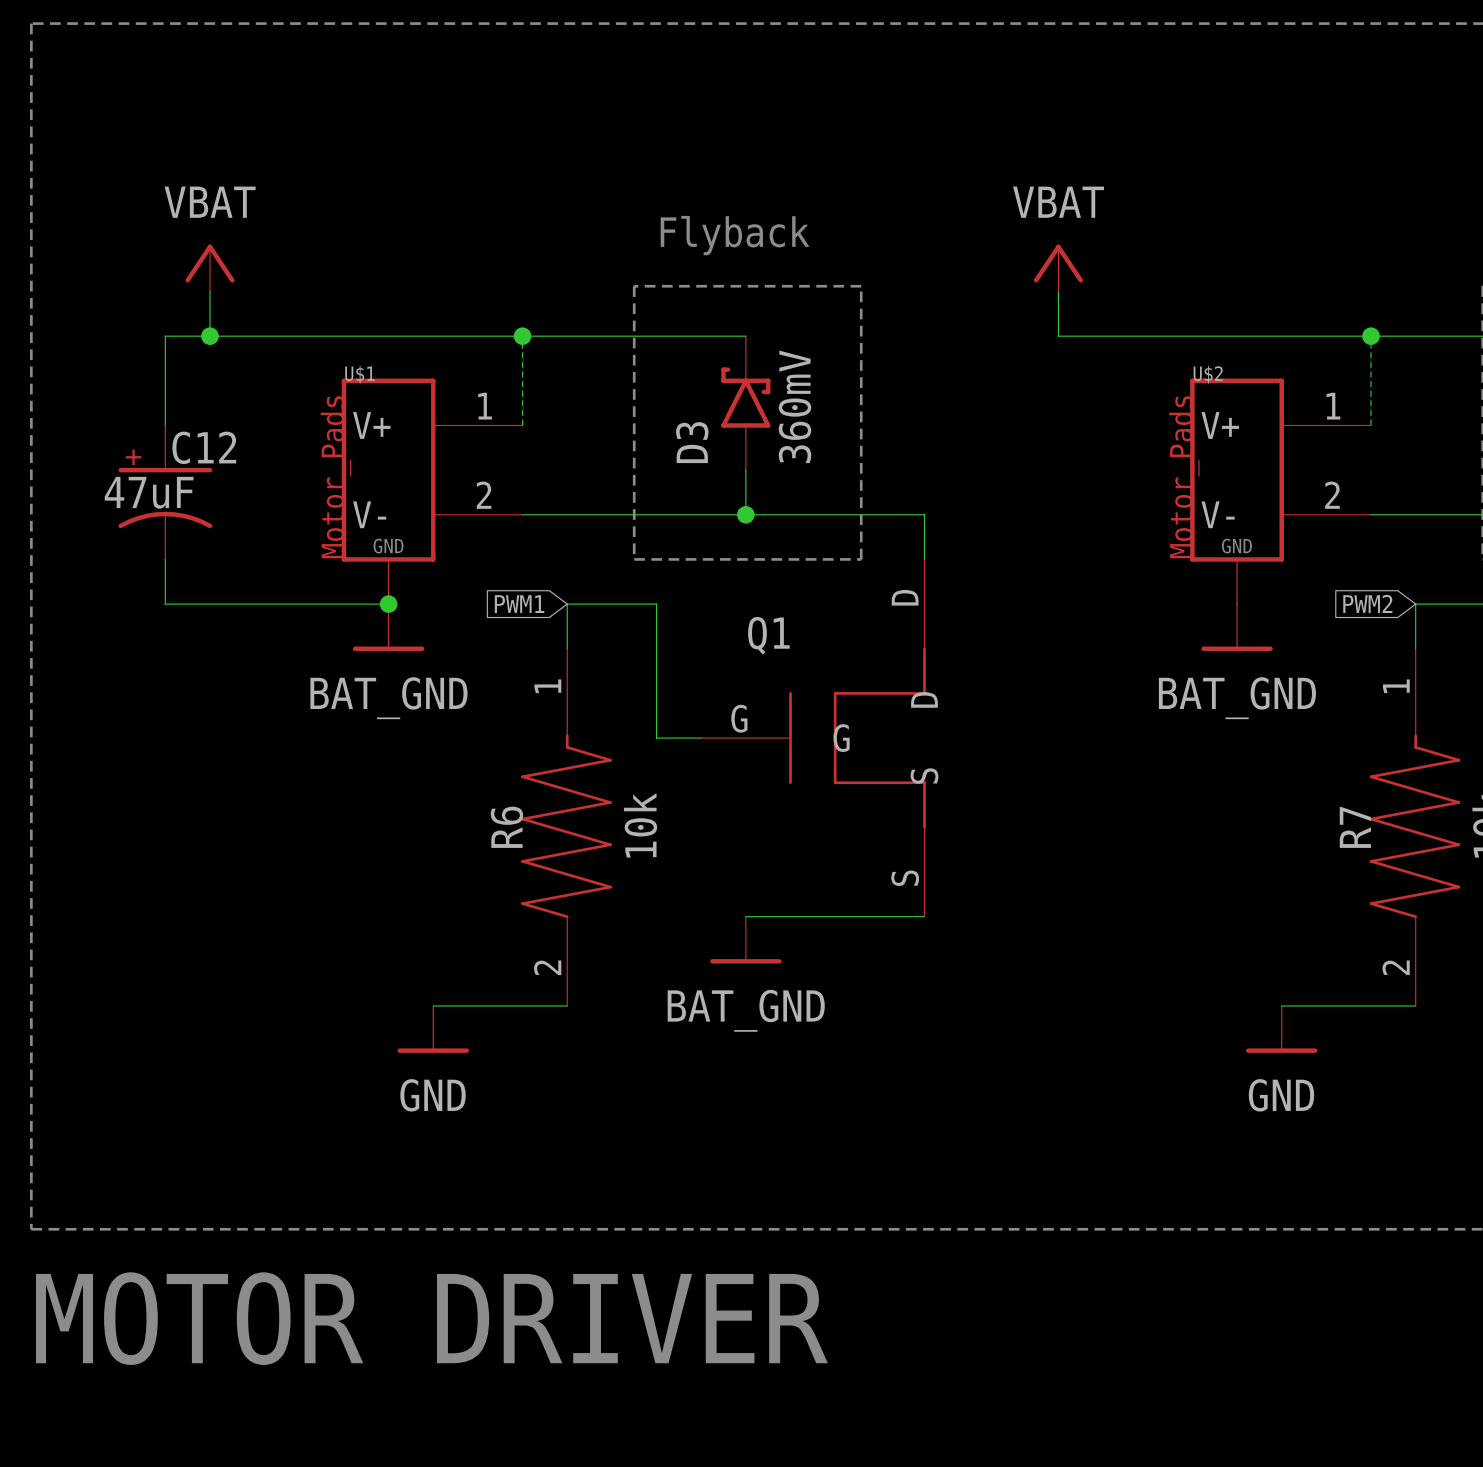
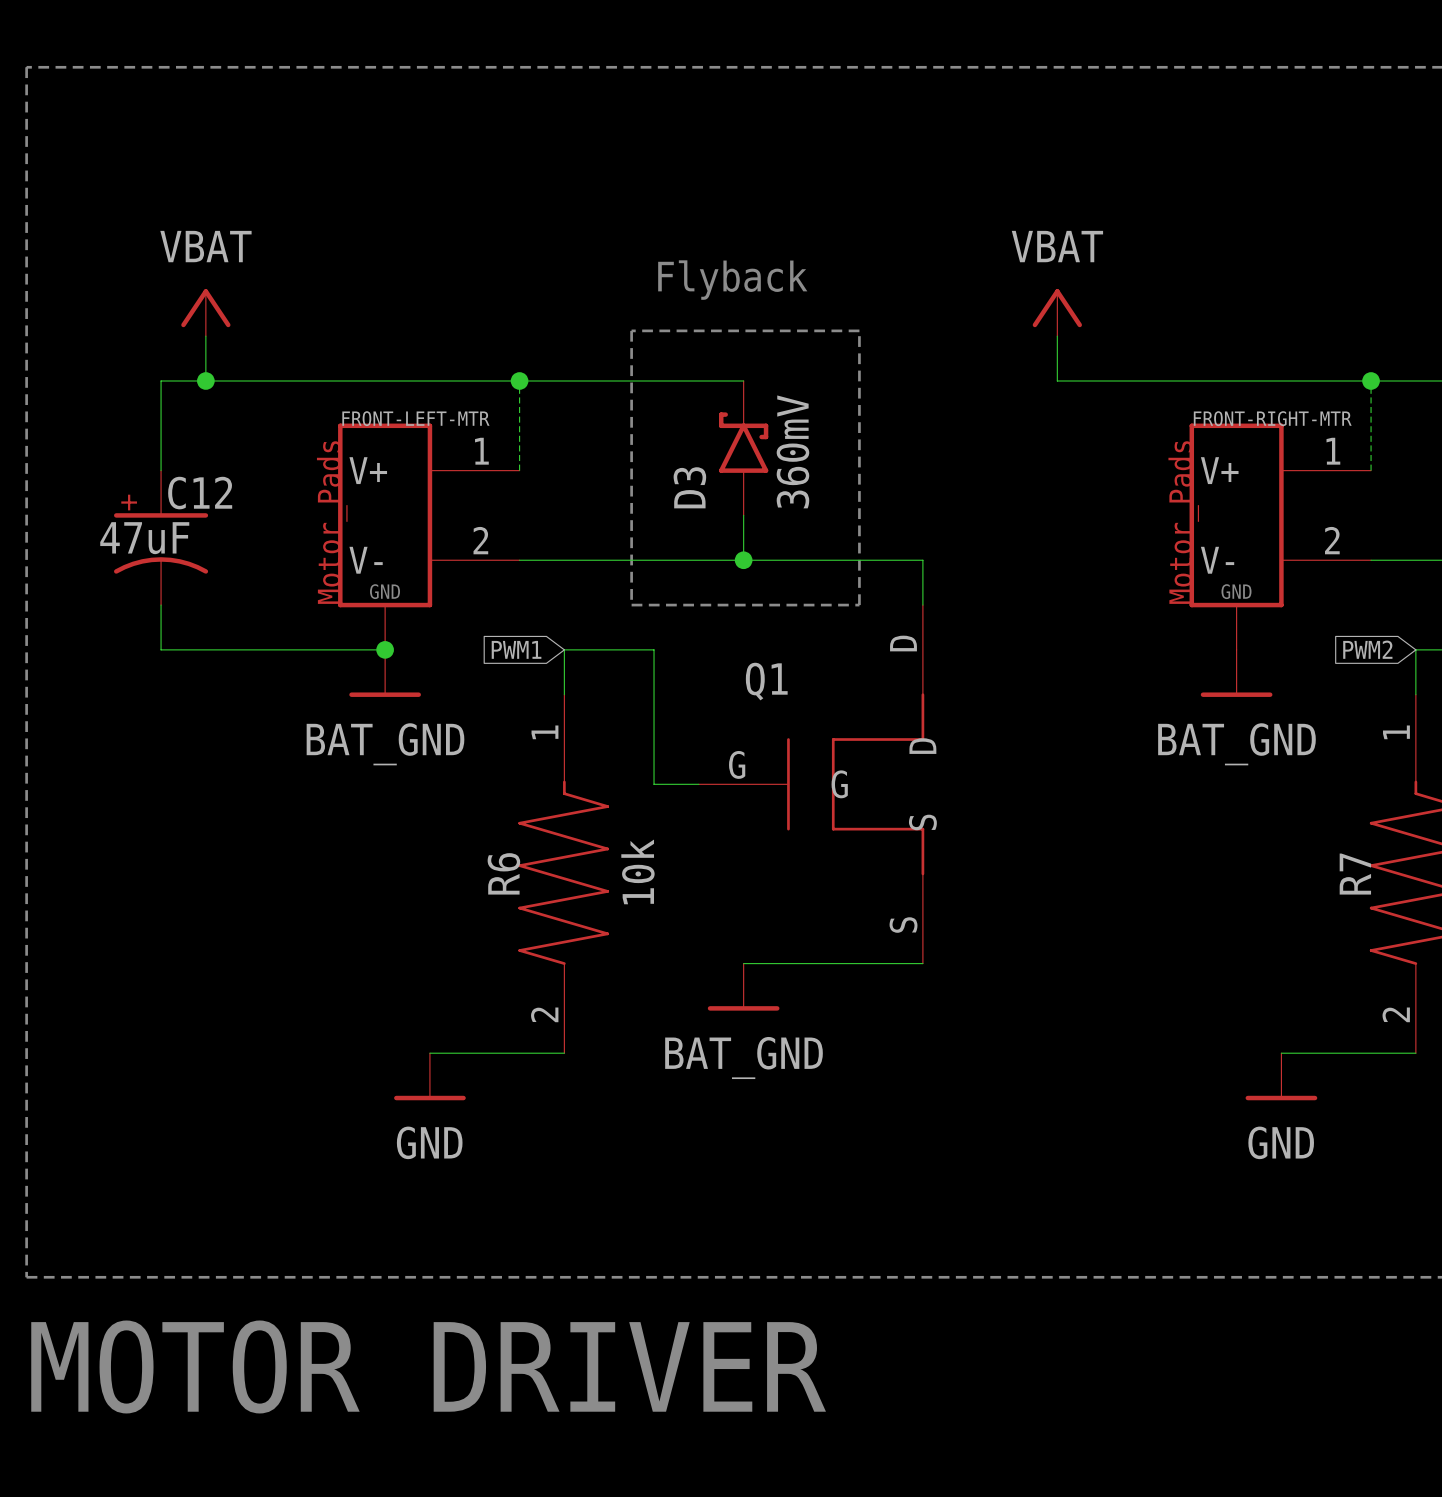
U$1 name: U$1 (359, 374) -> FRONT-LEFT-MTR (415, 418)
U$2 name: U$2 (1208, 374) -> FRONT-RIGHT-MTR (1272, 418)

